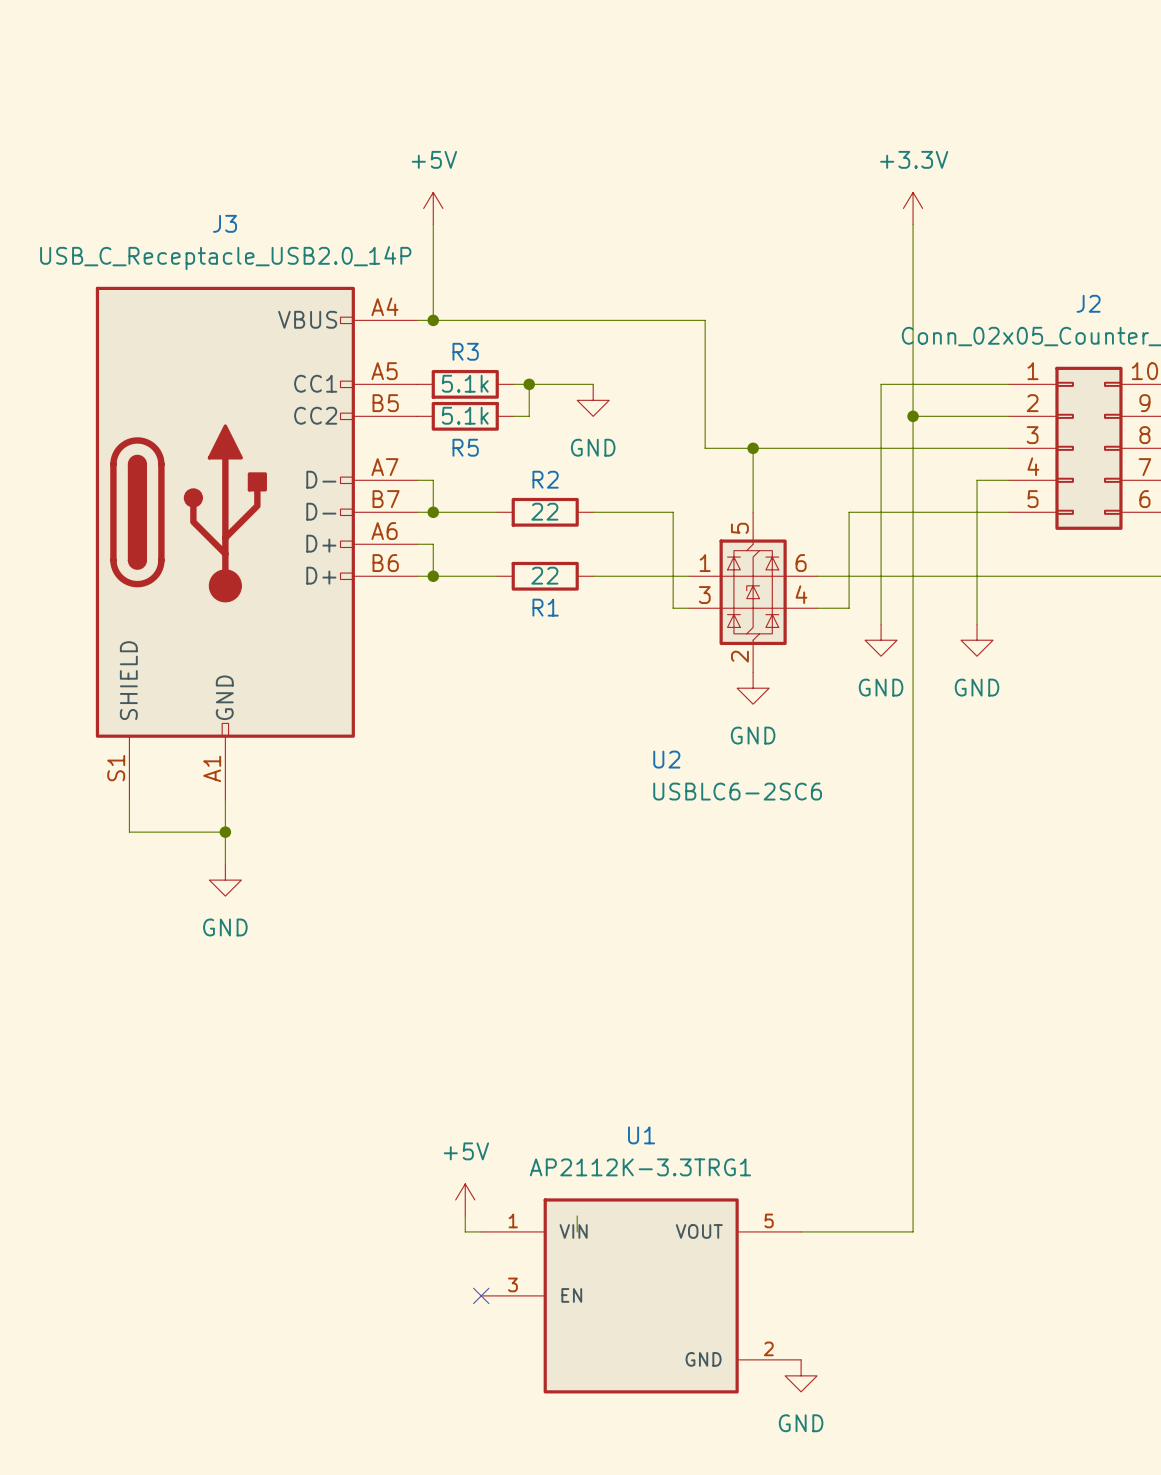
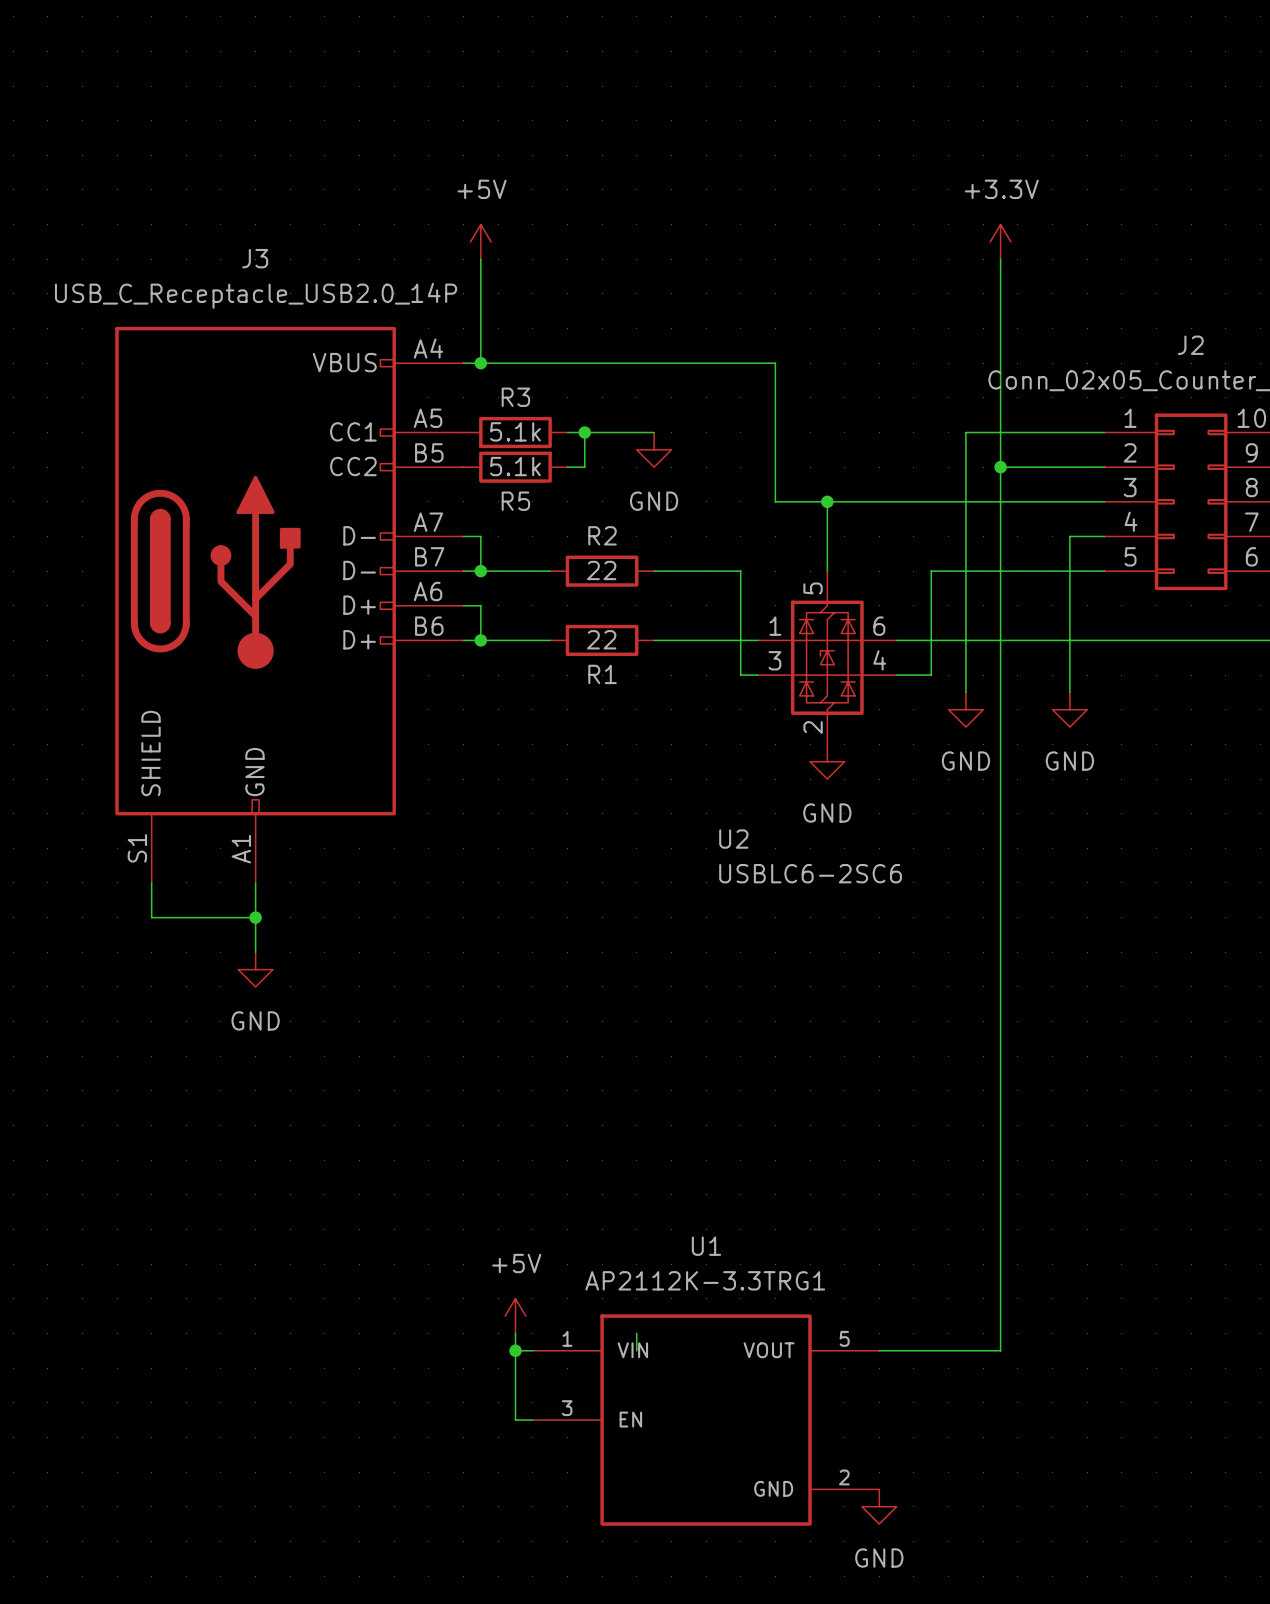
wire: none -> (515, 1350) (515, 1420) (532, 1420)
junction: none -> (515, 1350)
no-connect mark: (481, 1295) -> none

